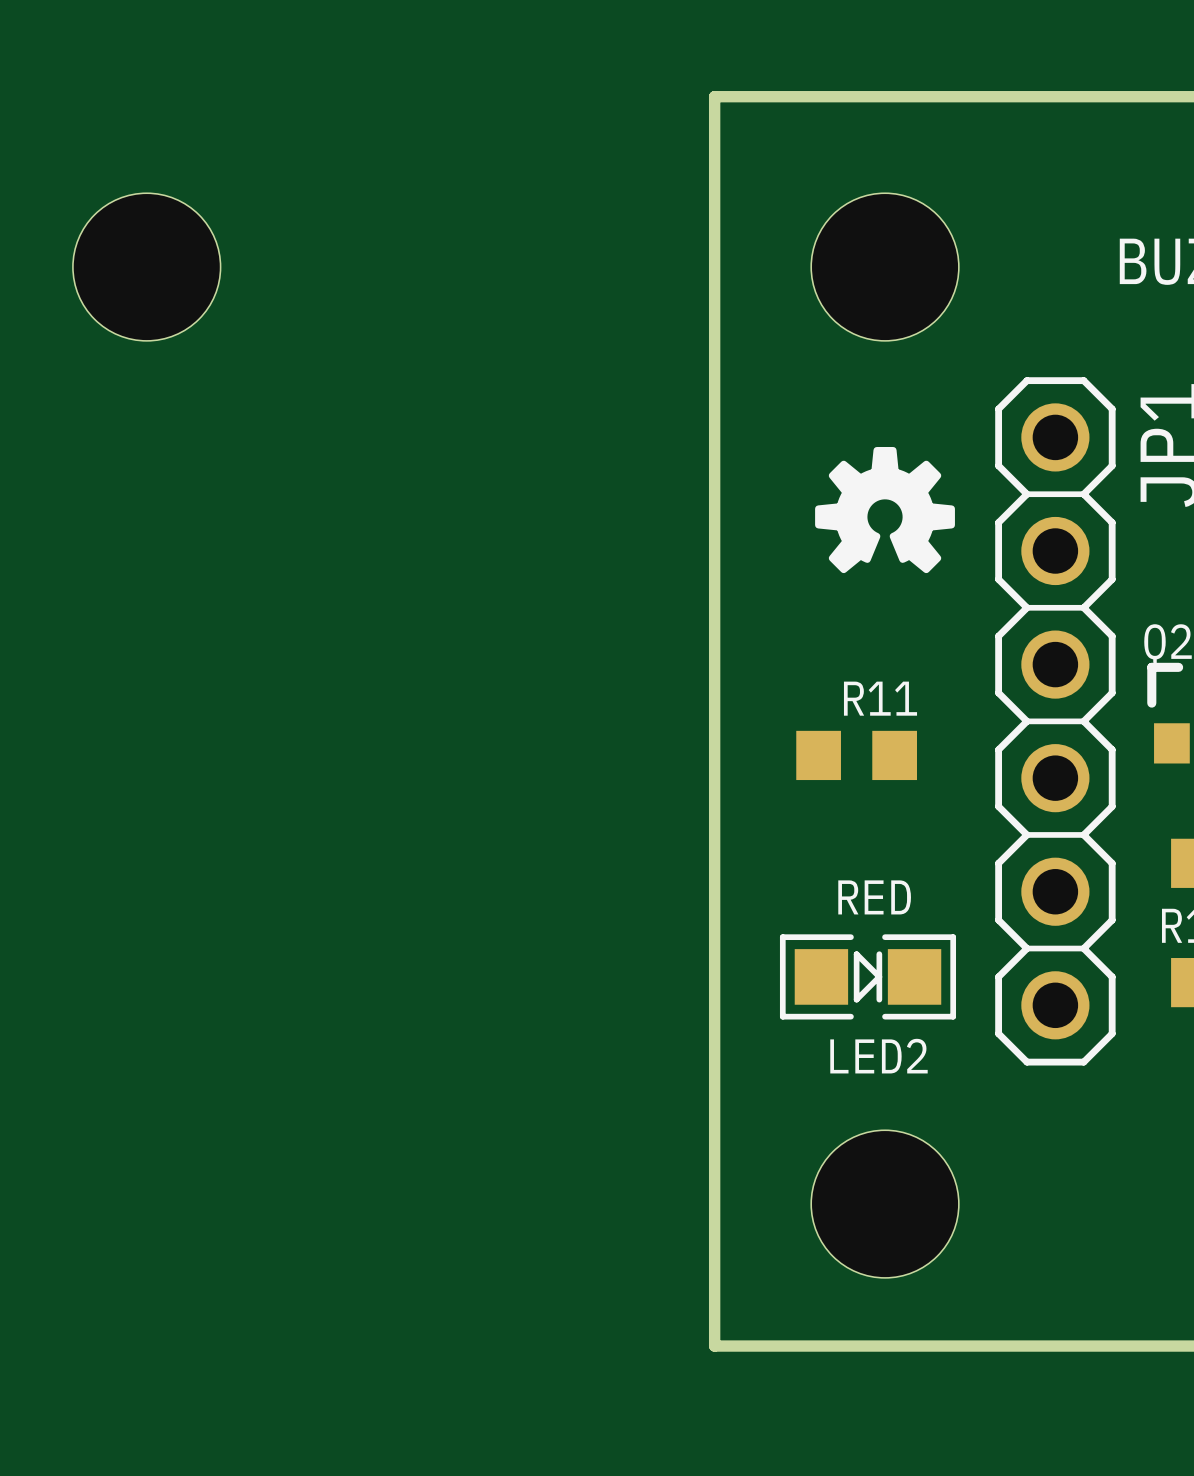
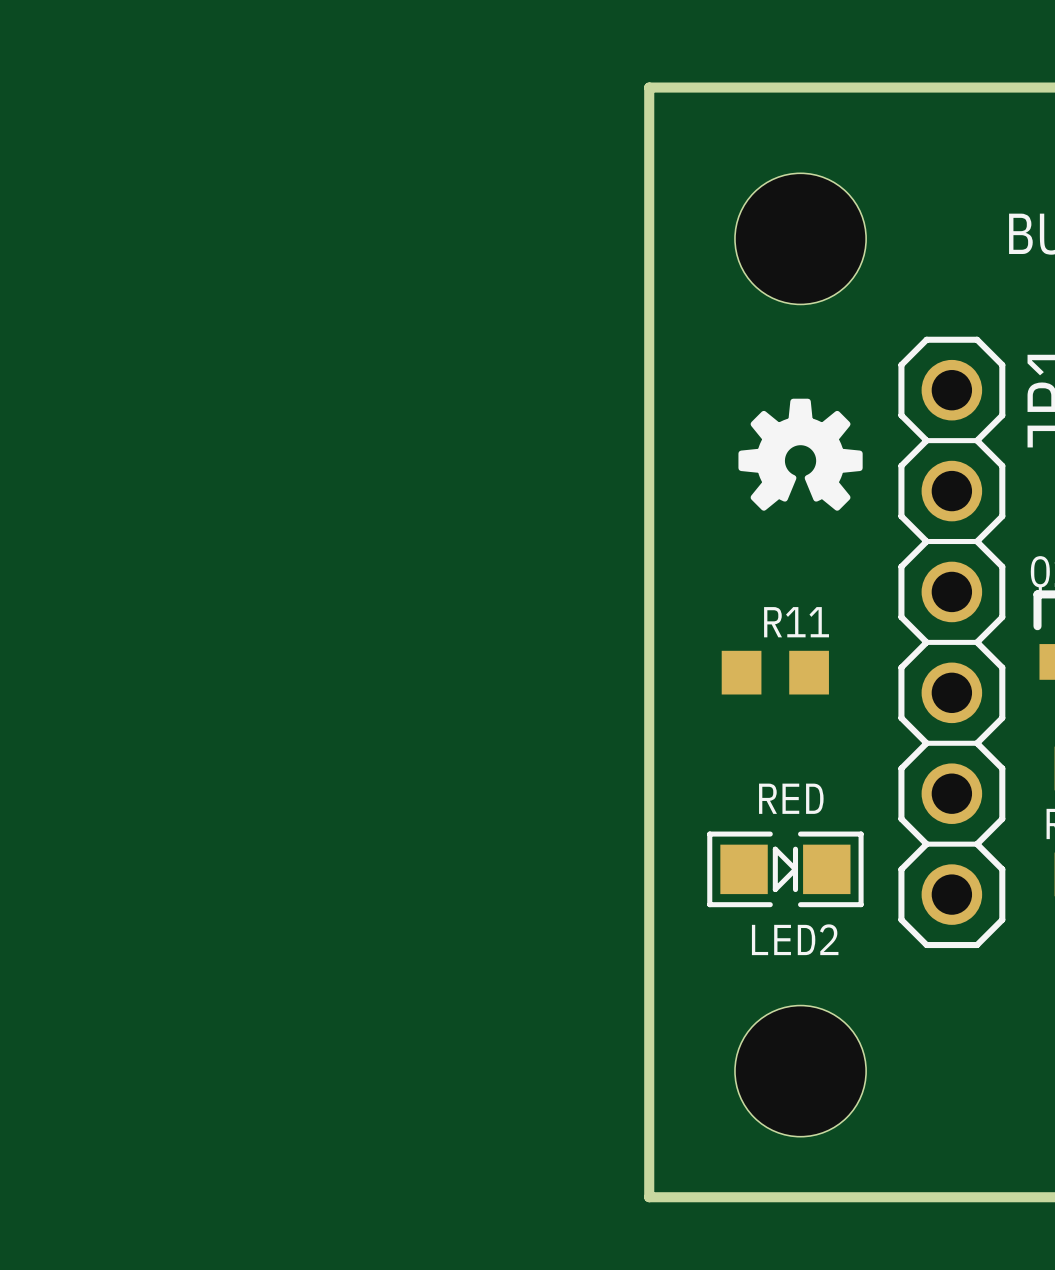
part: (146, 267) -> none

